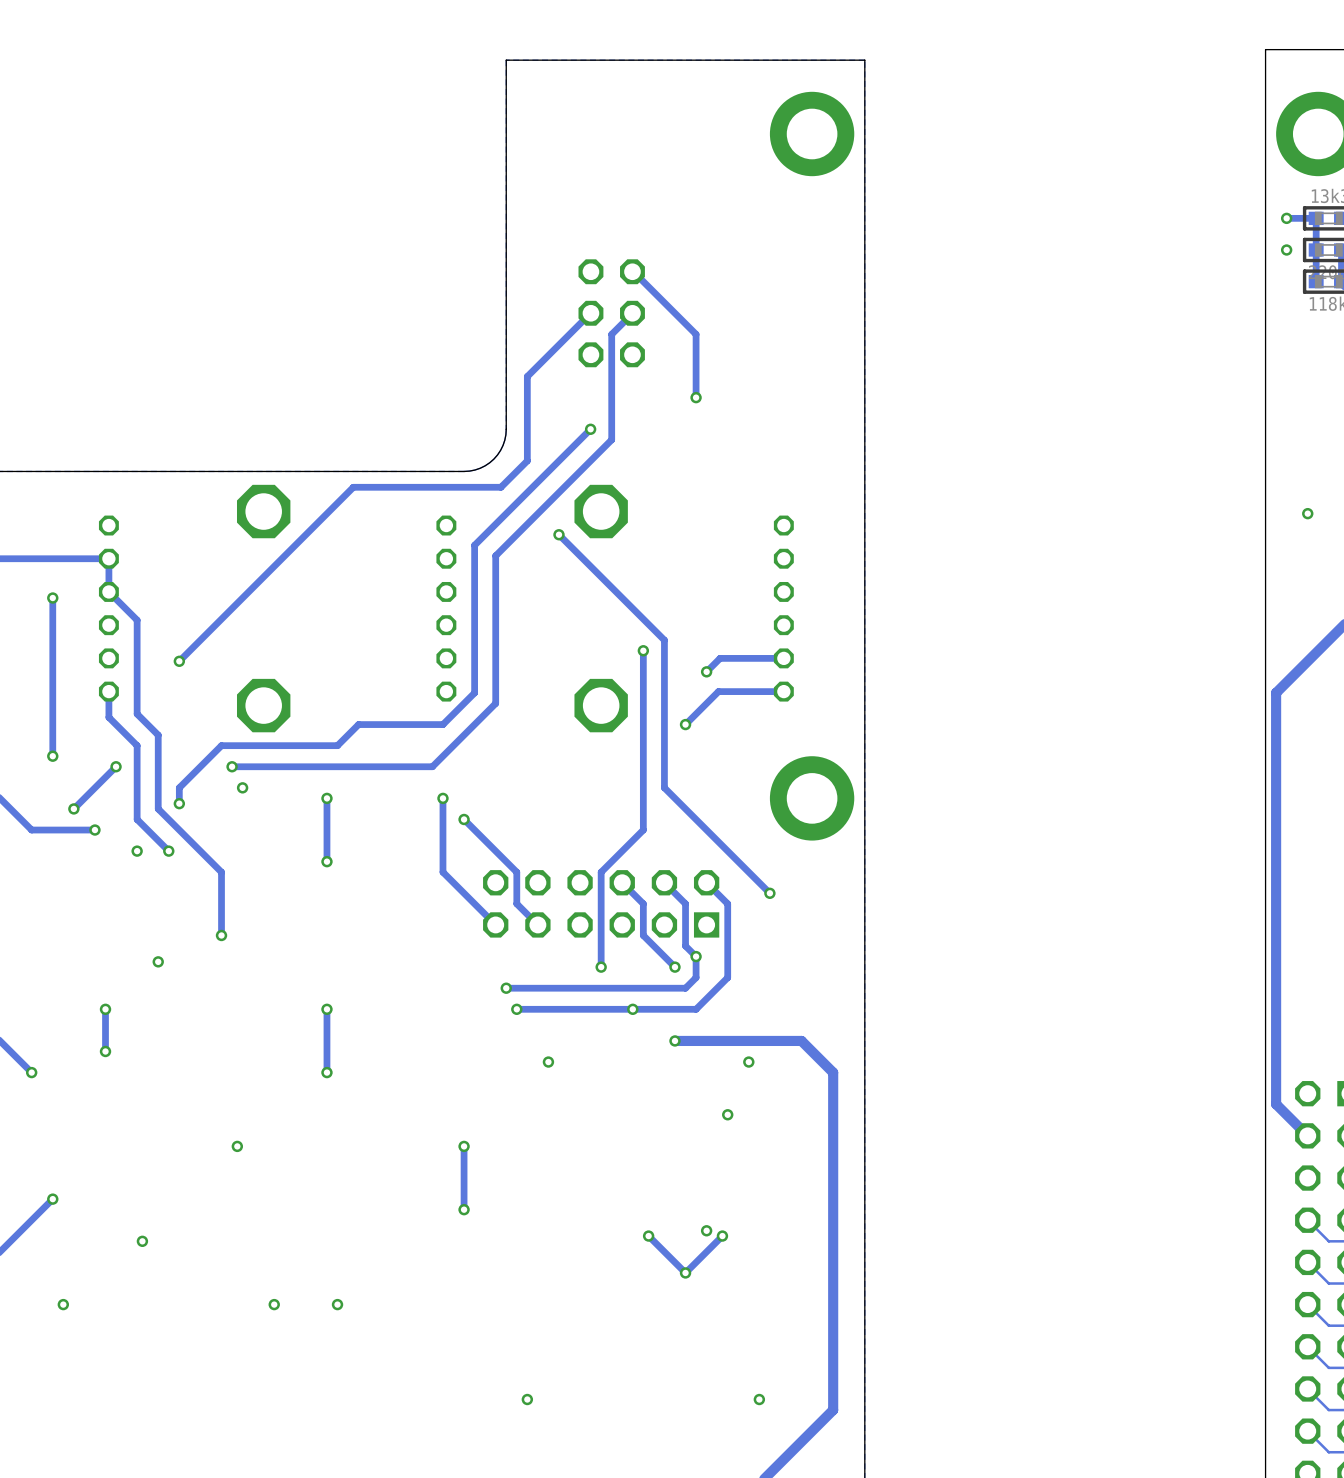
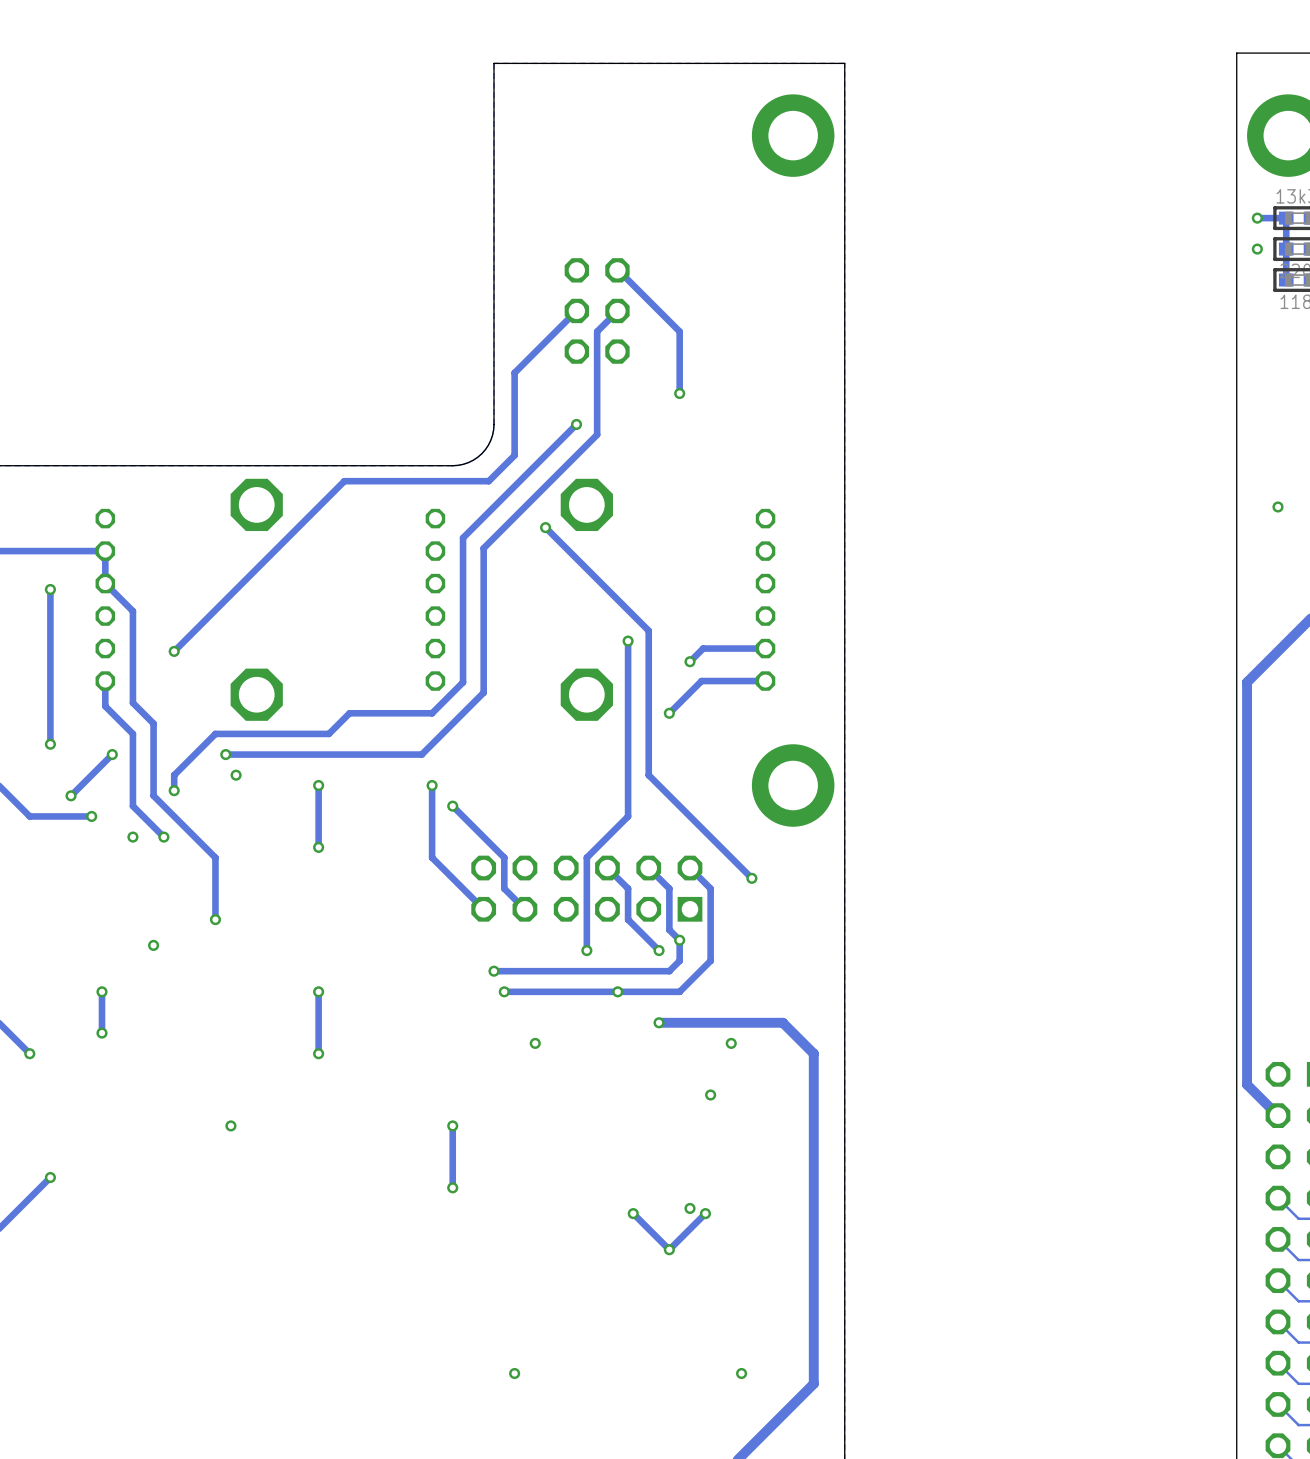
via: (142, 1241) -> none
via: (63, 1304) -> none
via: (274, 1304) -> none
via: (337, 1304) -> none

